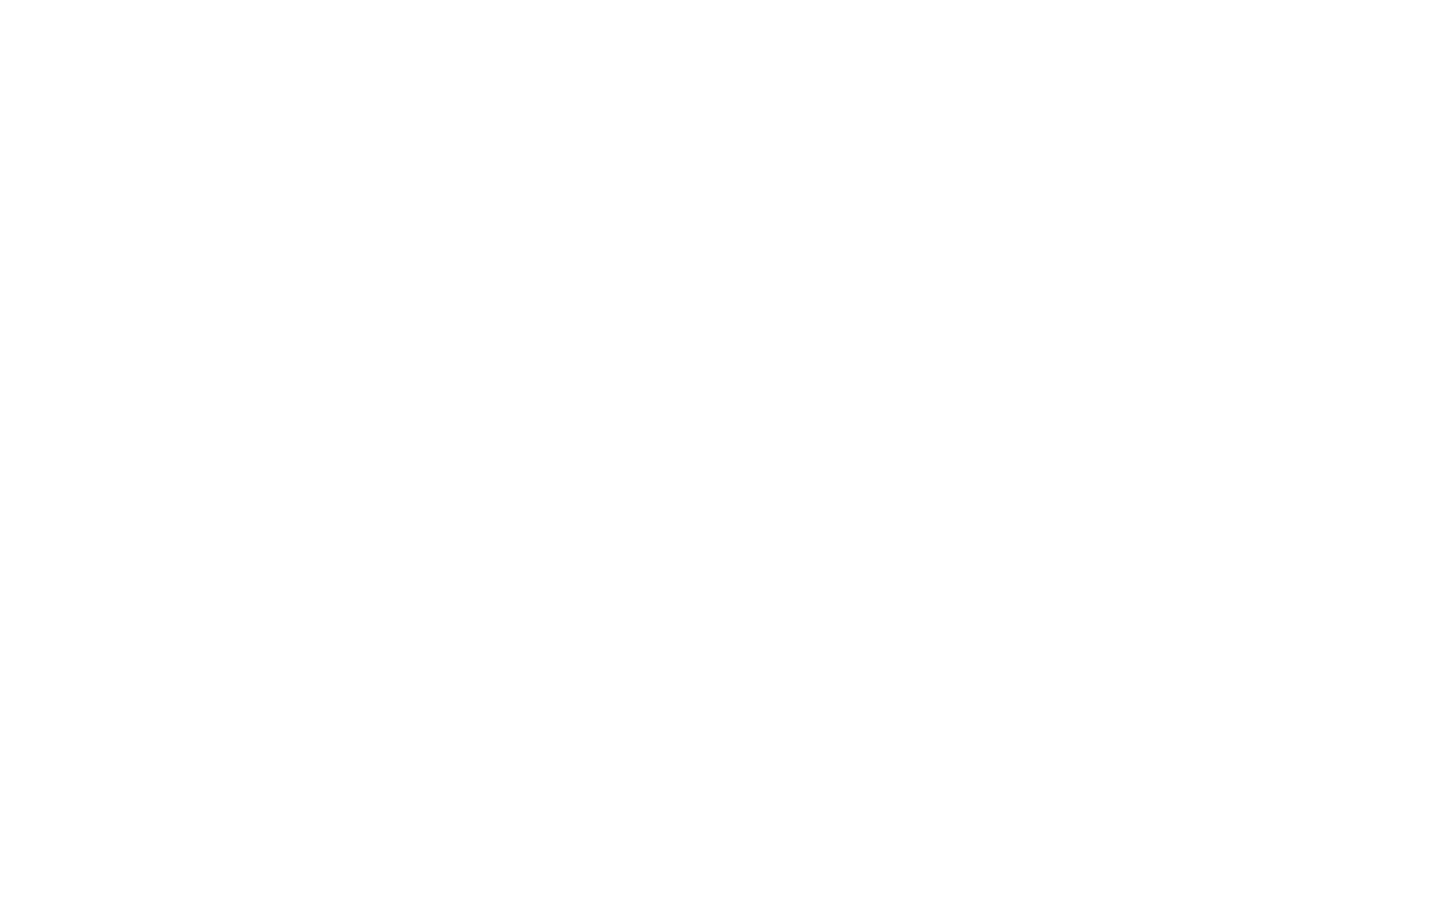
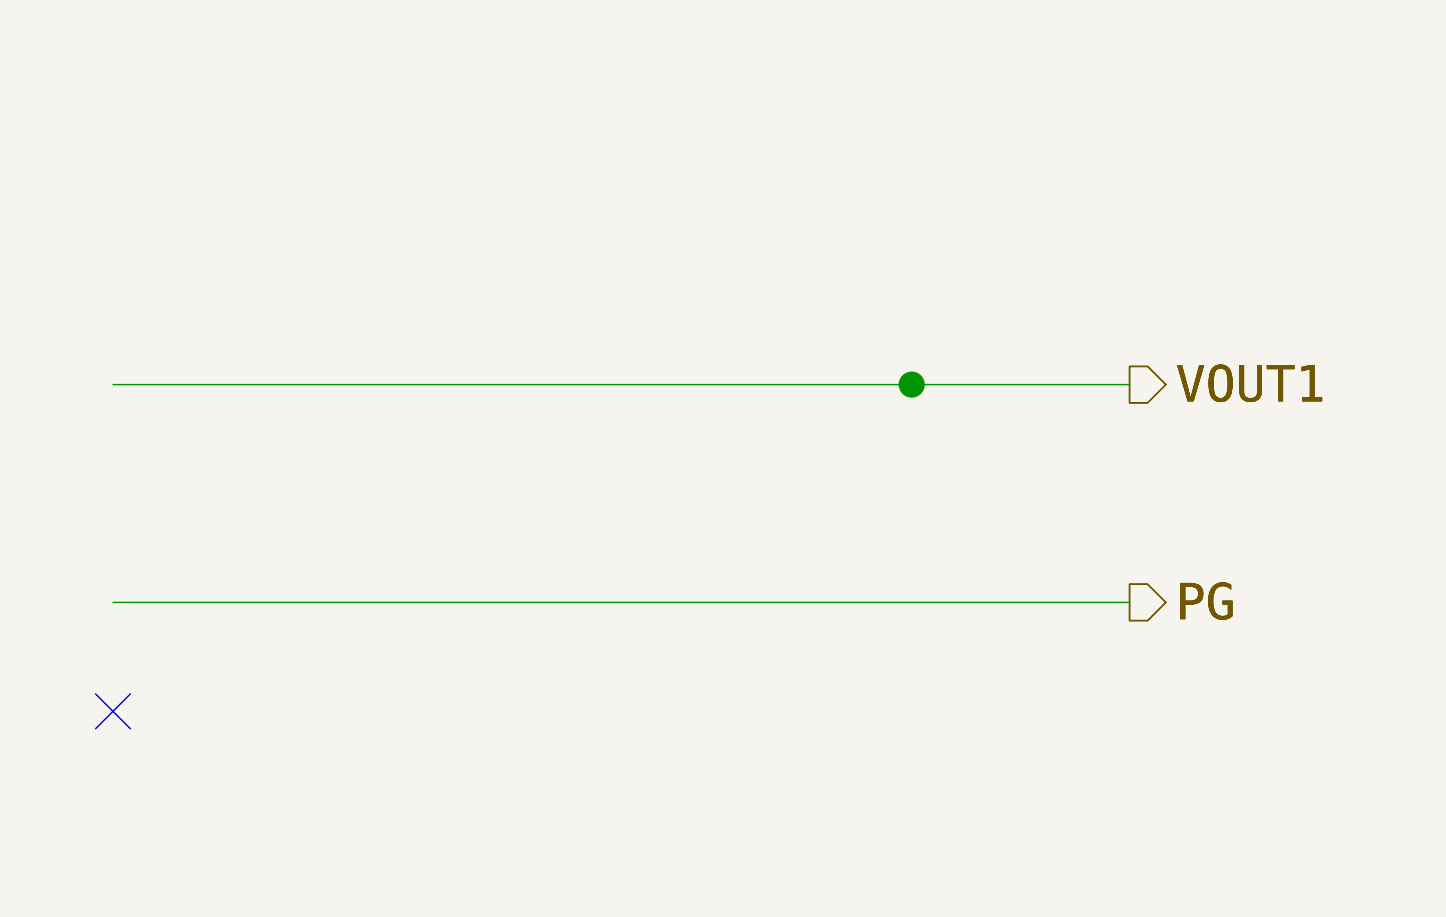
hierarchical label: none -> VOUT1 (1249, 383)
wire: none -> (113, 384) (1129, 384)
junction: none -> (911, 384)
hierarchical label: none -> PG (1206, 601)
wire: none -> (113, 602) (1129, 602)
no-connect mark: none -> (113, 711)

